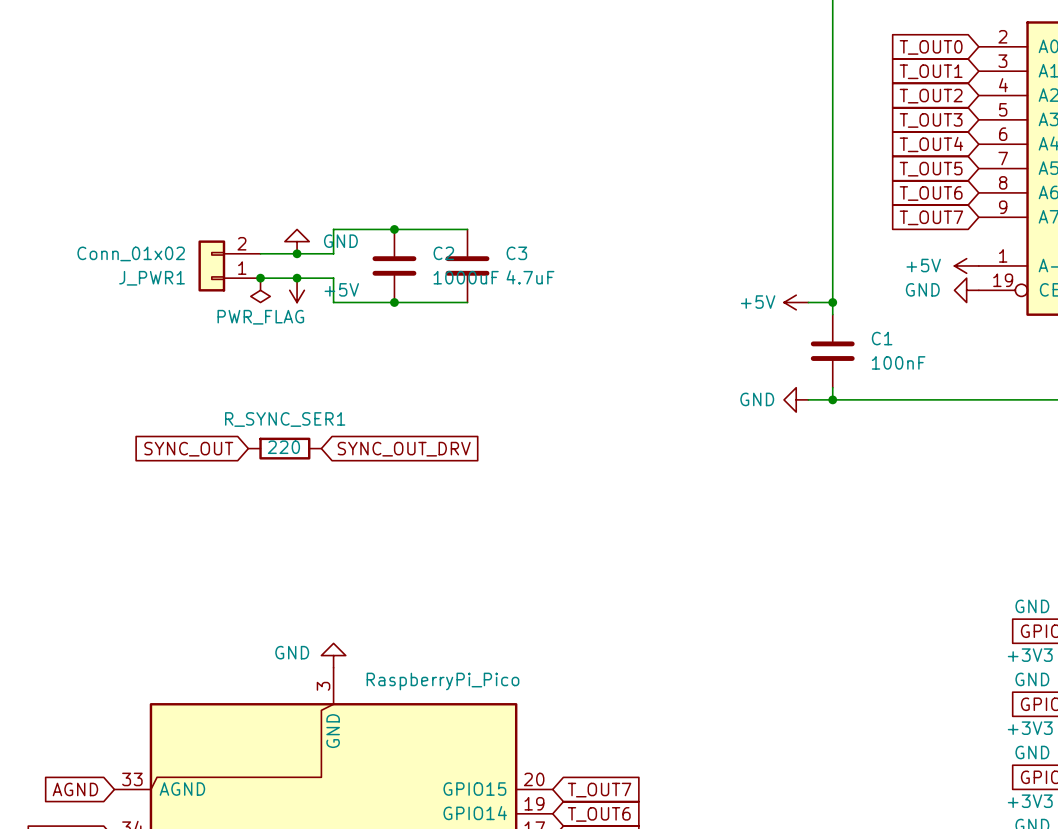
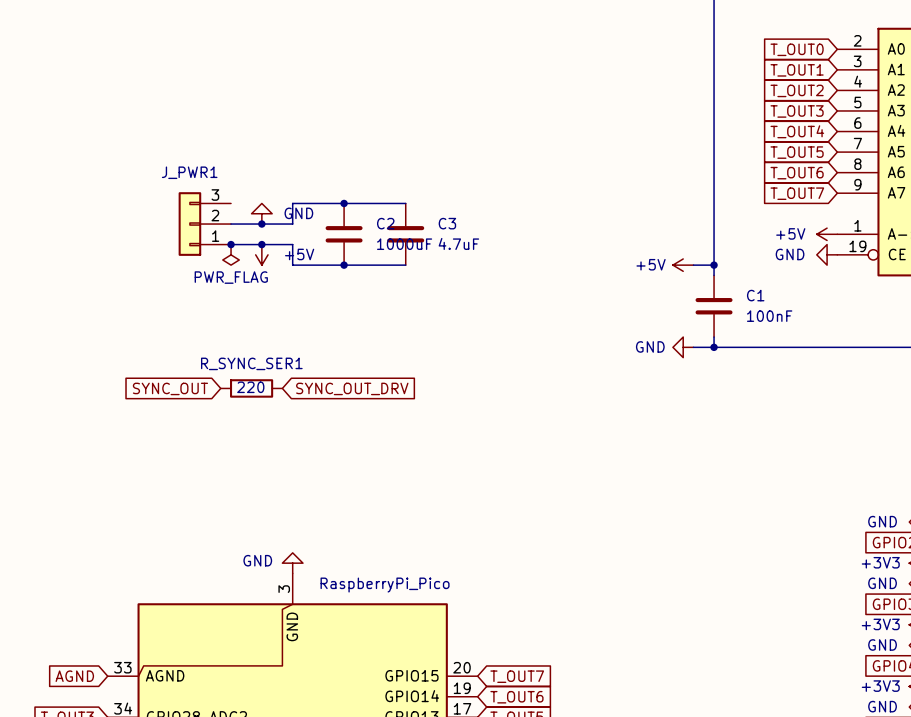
J_PWR1 symbol: [198, 240, 261, 292] -> [178, 192, 232, 256]
J_PWR1 value: Conn_01x02 (131, 253) -> none
J_PWR1 name position: J_PWR1 (152, 278) -> J_PWR1 (189, 172)

